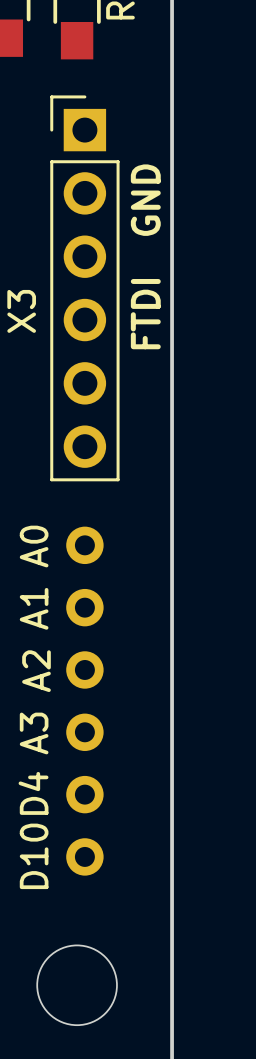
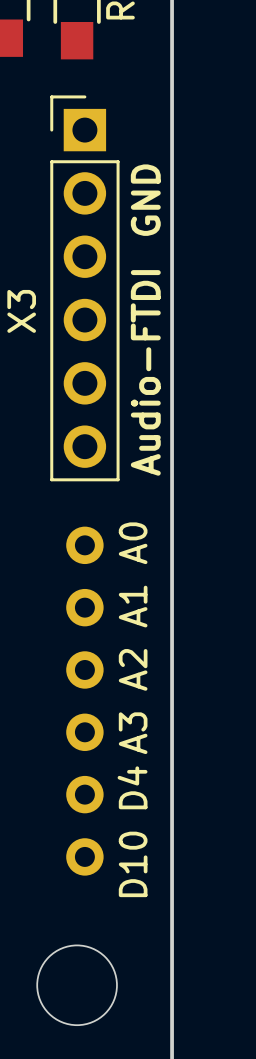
text: FTDI (145, 314) -> none
text: none -> Audio-FTDI (145, 372)
A0 name position: A0 (34, 546) -> A0 (133, 543)
A1 name position: A1 (34, 608) -> A1 (133, 606)
A2 name position: A2 (36, 671) -> A2 (133, 669)
A3 name position: A3 (34, 733) -> A3 (133, 733)
D4 name position: D4 (33, 793) -> D4 (132, 787)
D10 name position: D10 (34, 856) -> D10 (133, 864)

